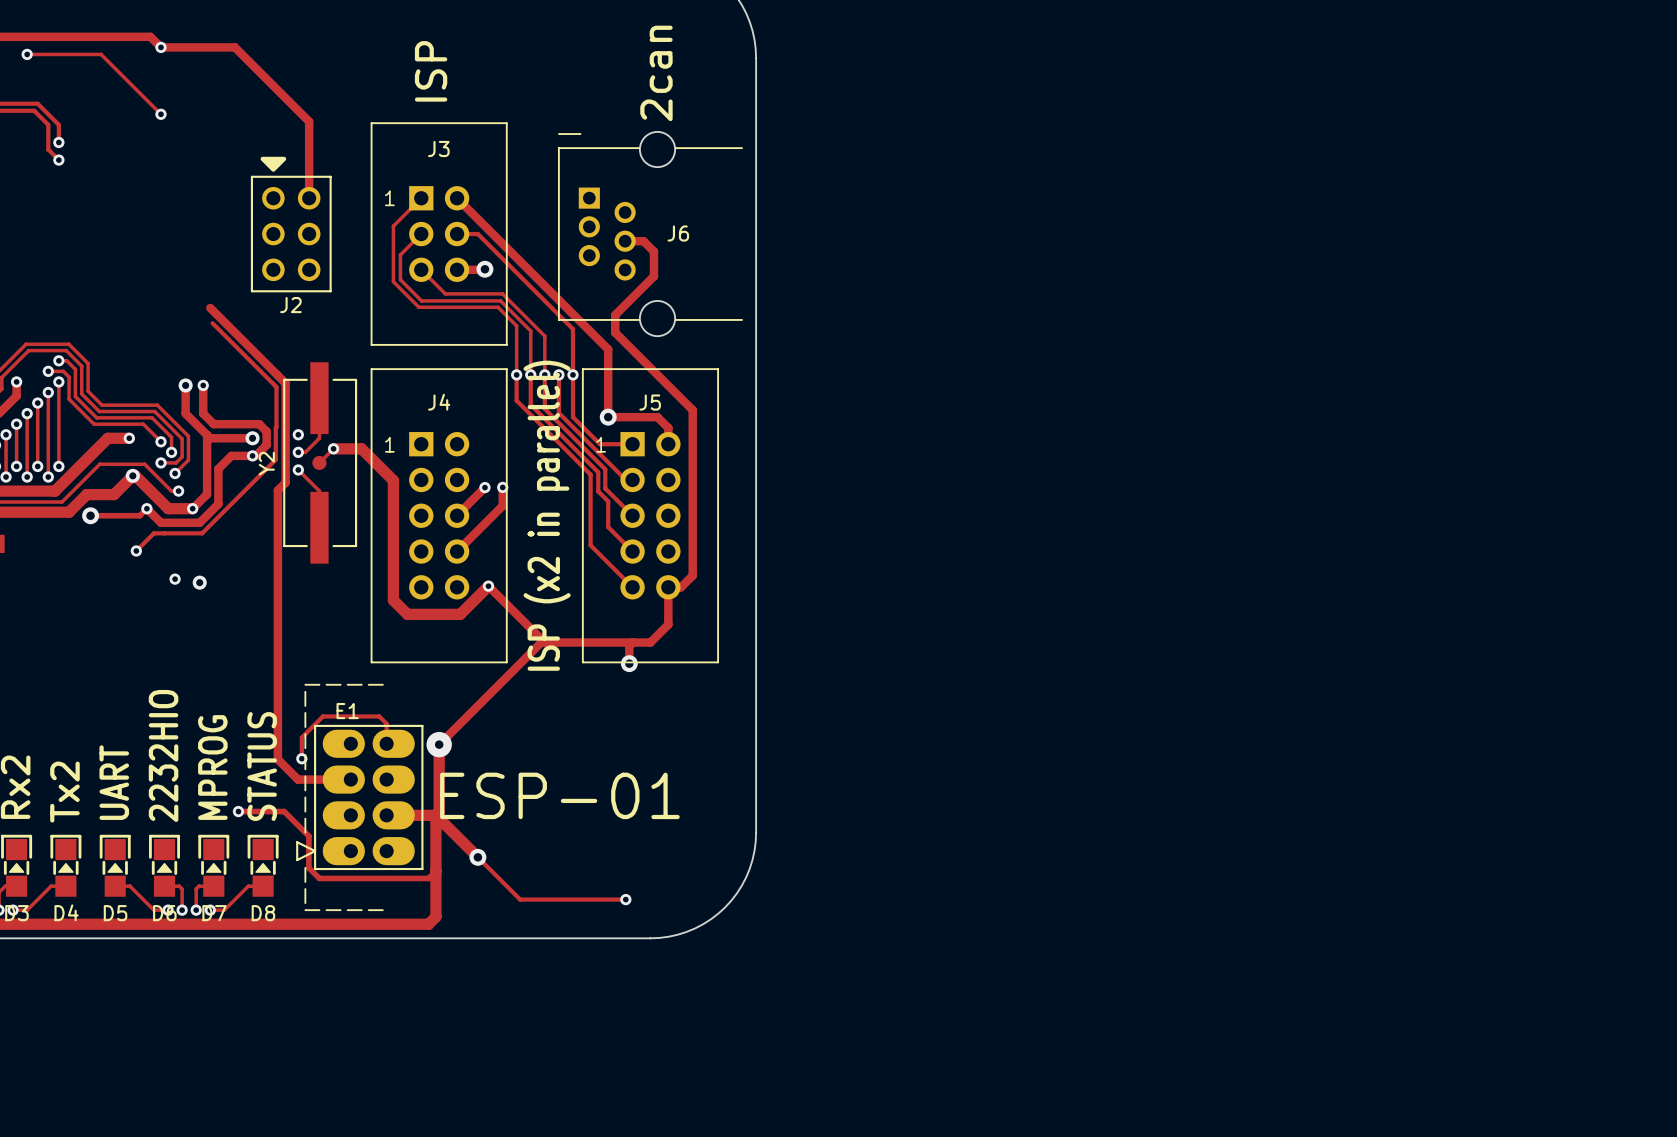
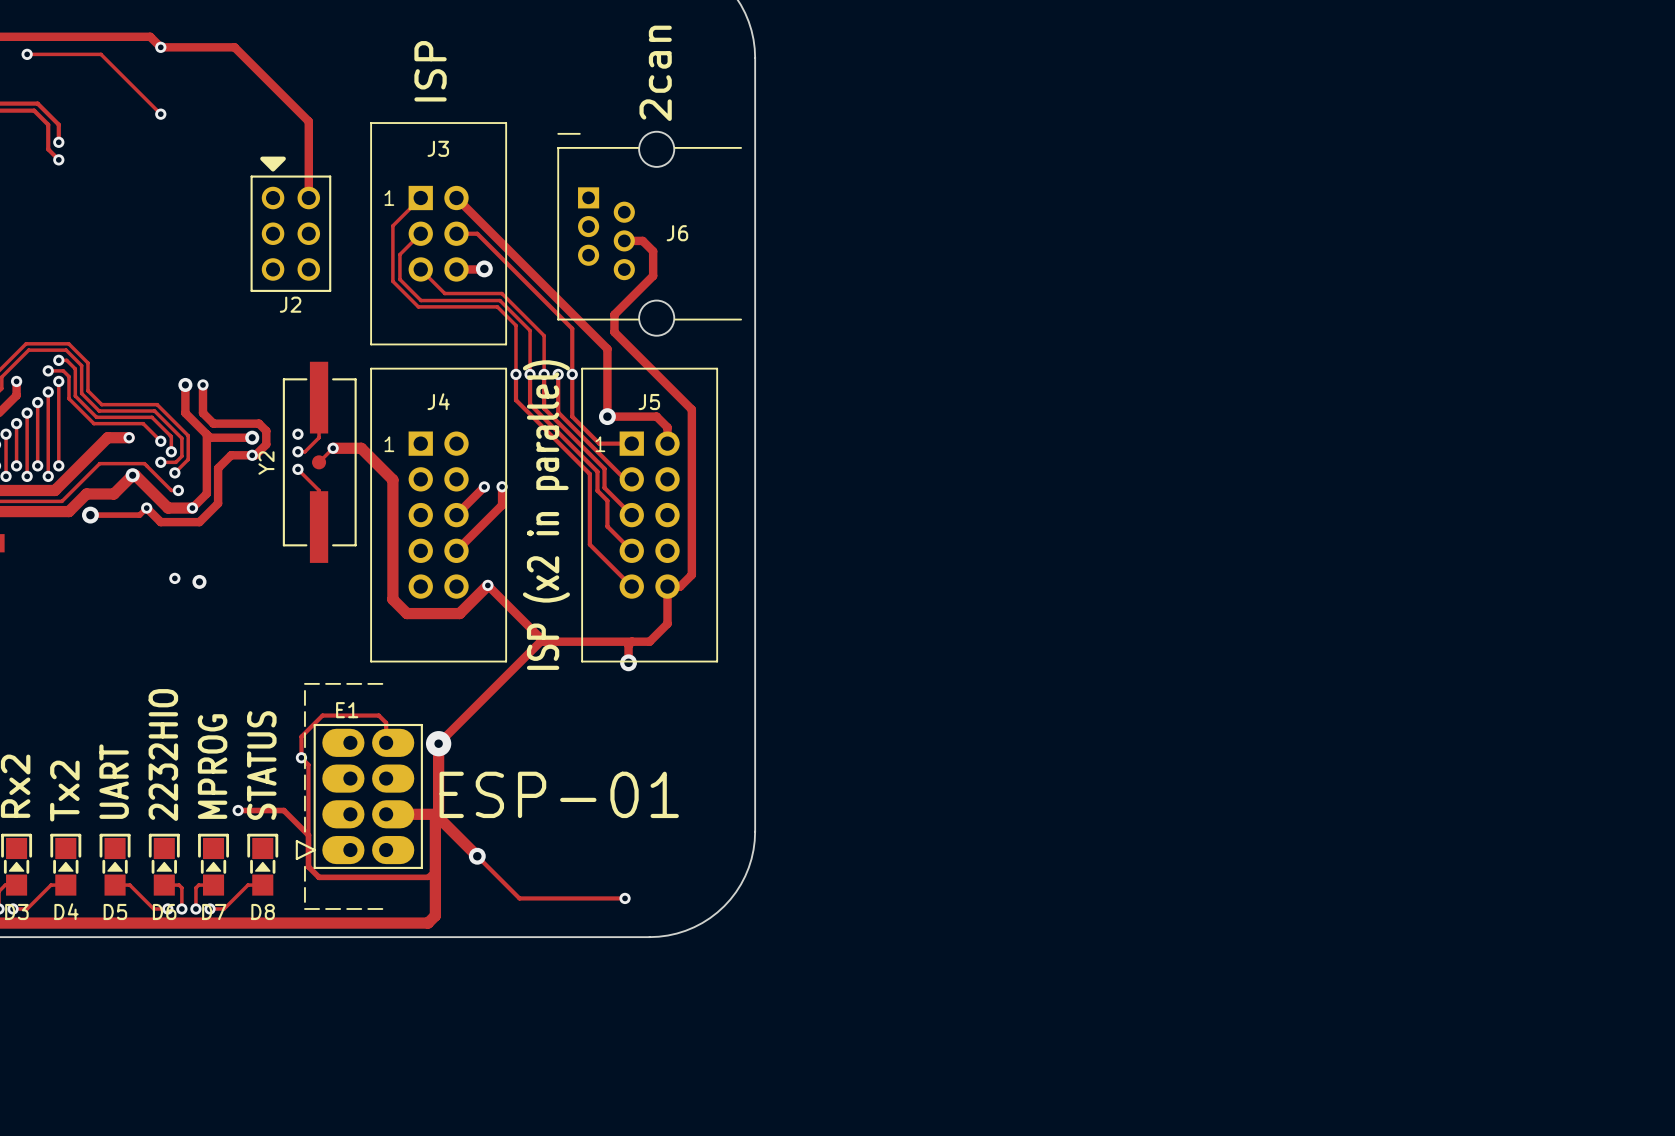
track: (210, 307) (285, 383) (285, 482) (277, 490) (277, 759) (298, 779) (350, 779) -> none
track: (212, 323) (276, 387) (275, 459) (202, 533) (153, 533) (136, 550) -> none
via: (136, 550) -> none
track: none -> (301, 757) (308, 764) (308, 835)

